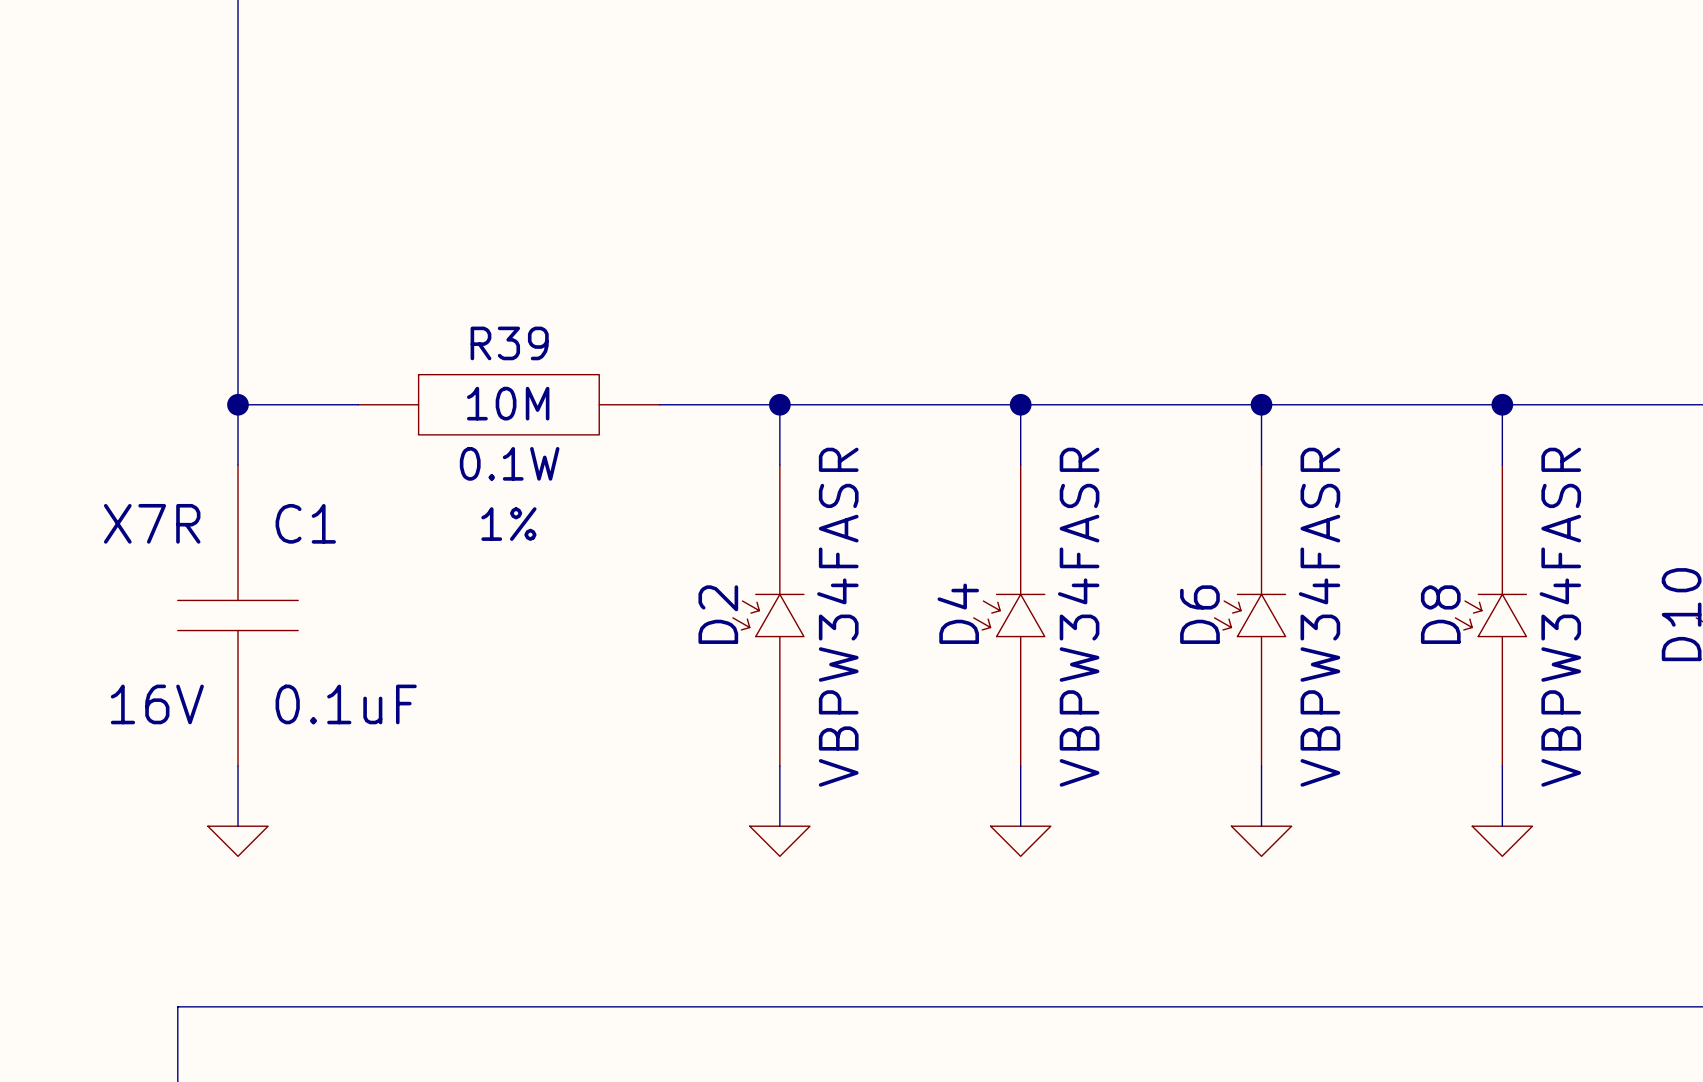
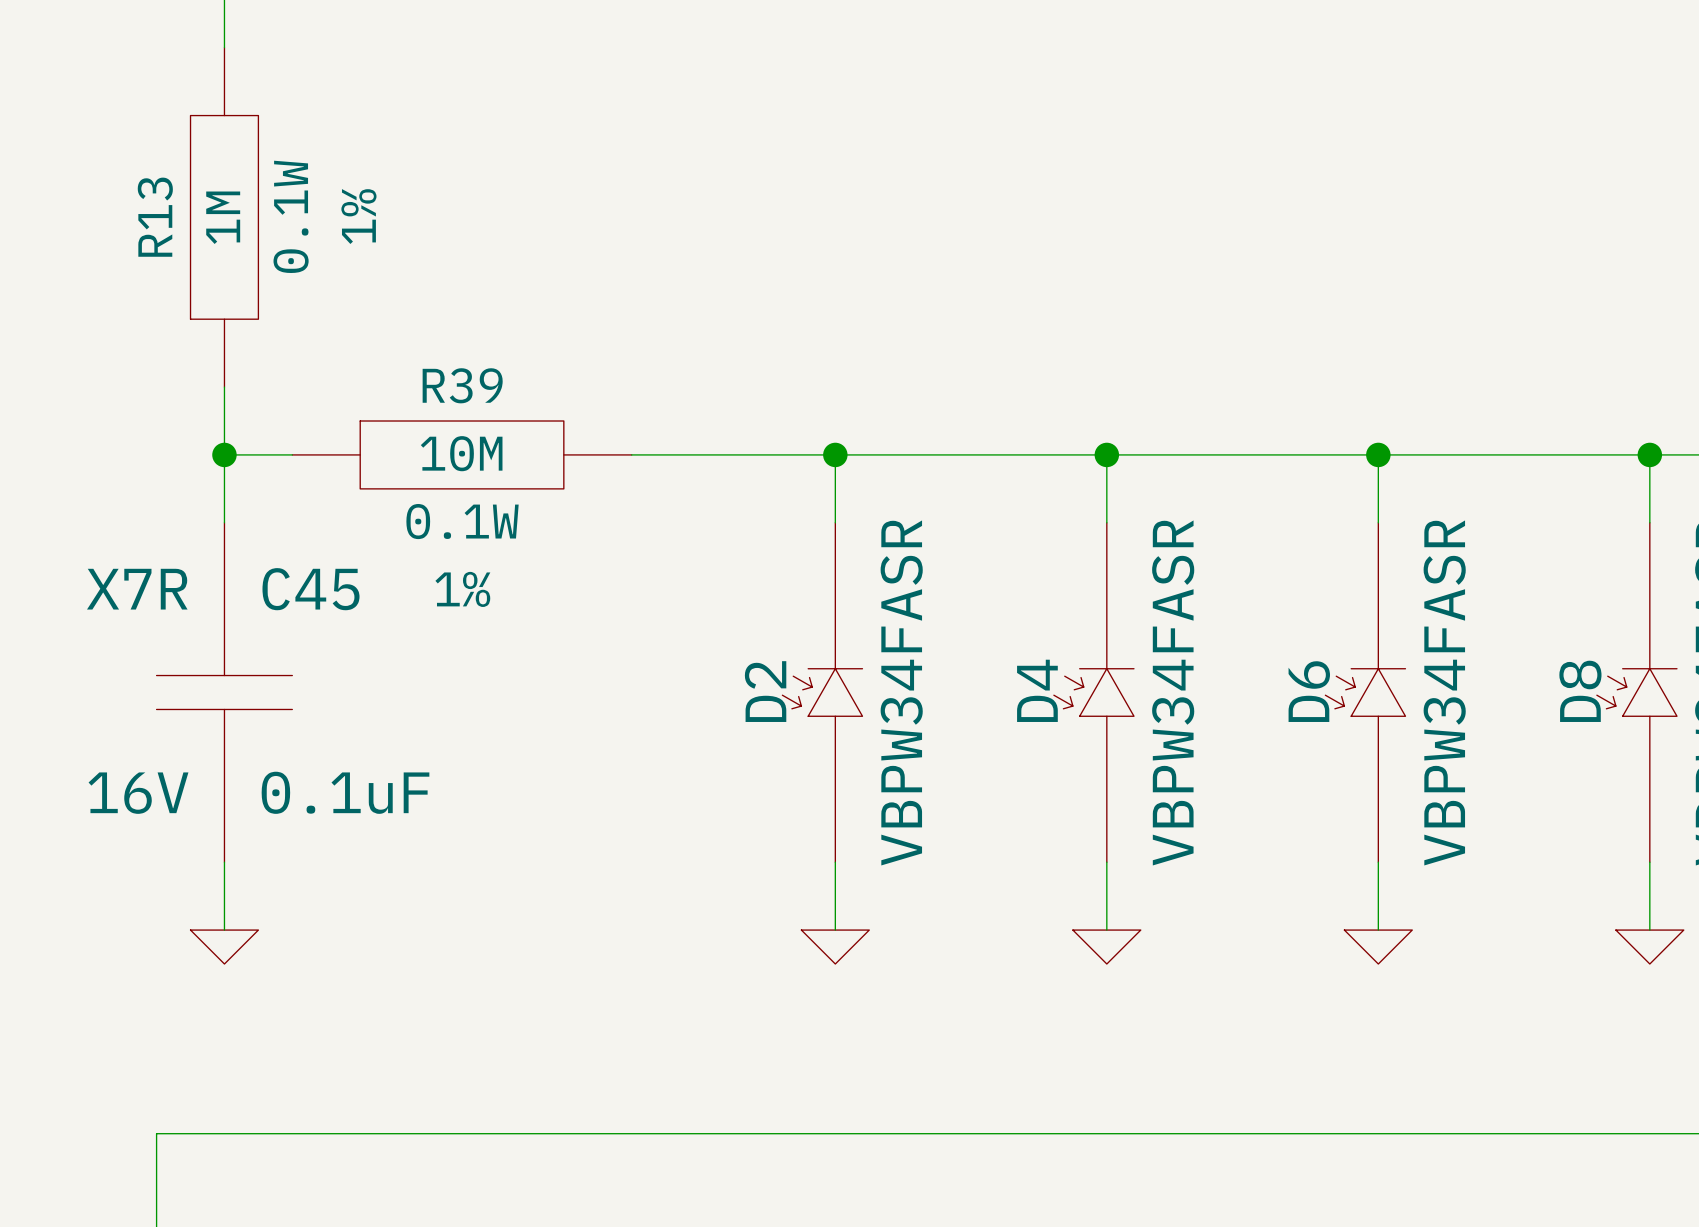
wire: (238, 43) (238, 344) -> none
R13: none -> 1M (224, 217)
R39 position: (508, 404) -> (462, 454)
C1 name: C1 (305, 523) -> C45 (310, 589)

